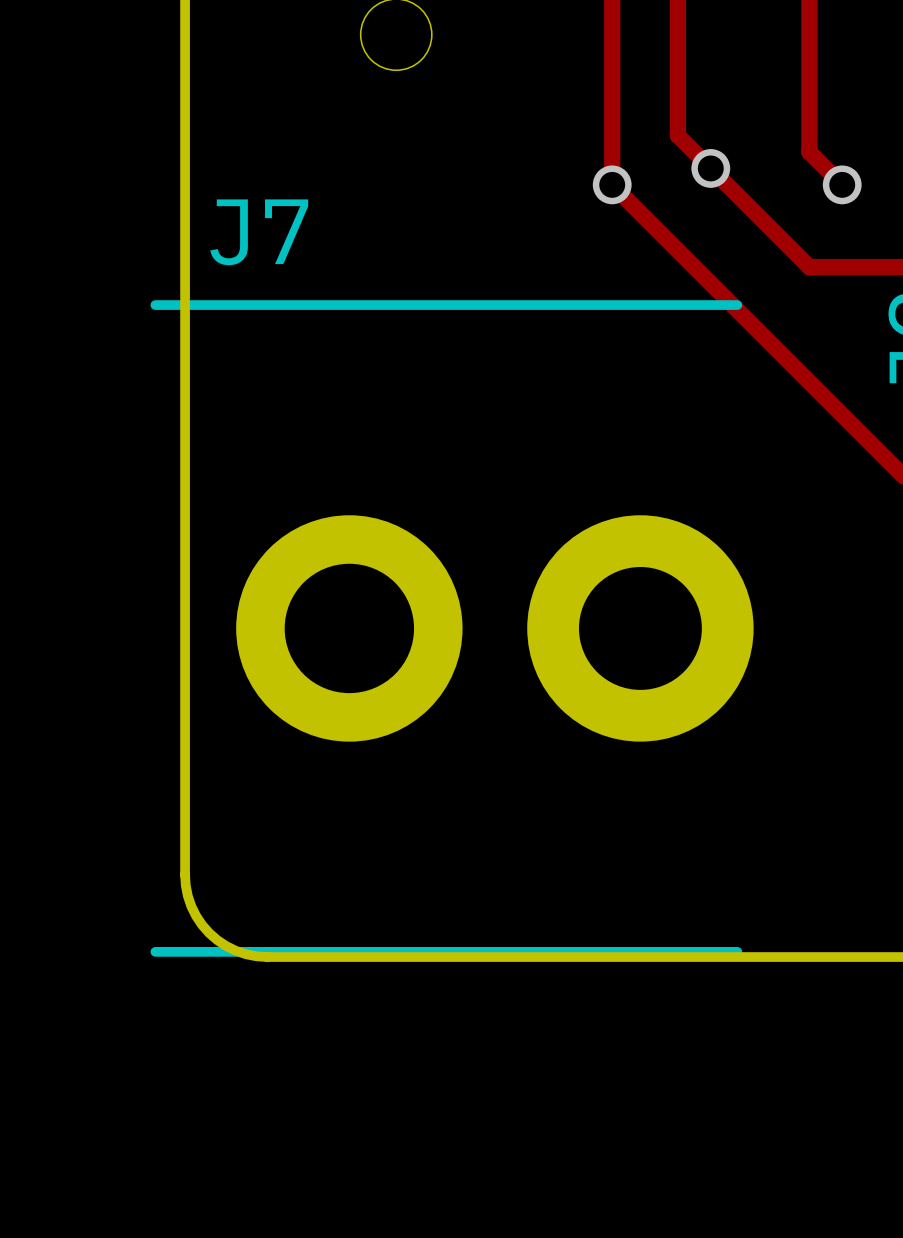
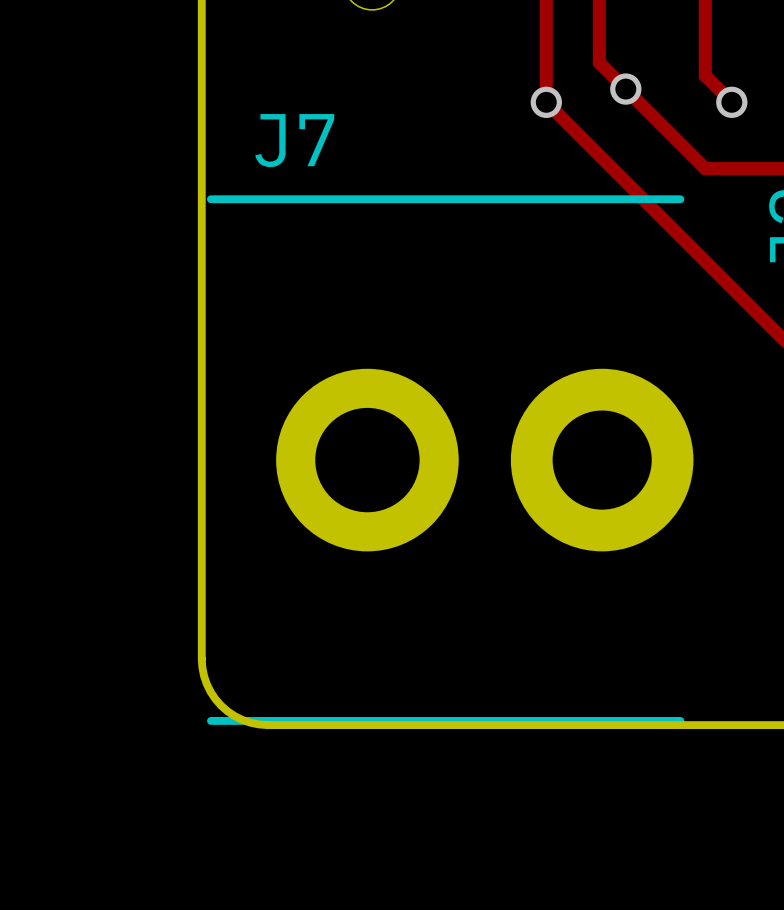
J7 position: (452, 628) -> (450, 460)

